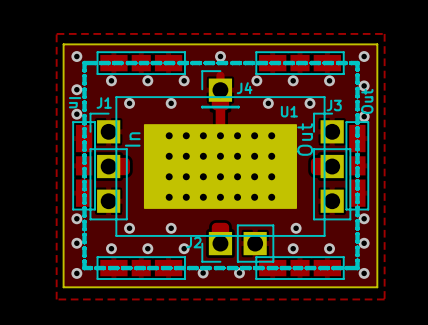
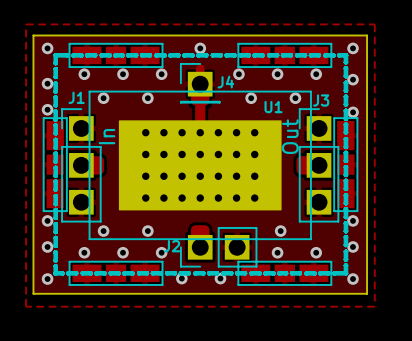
text: Out (367, 101) -> none
text: In (75, 102) -> none

